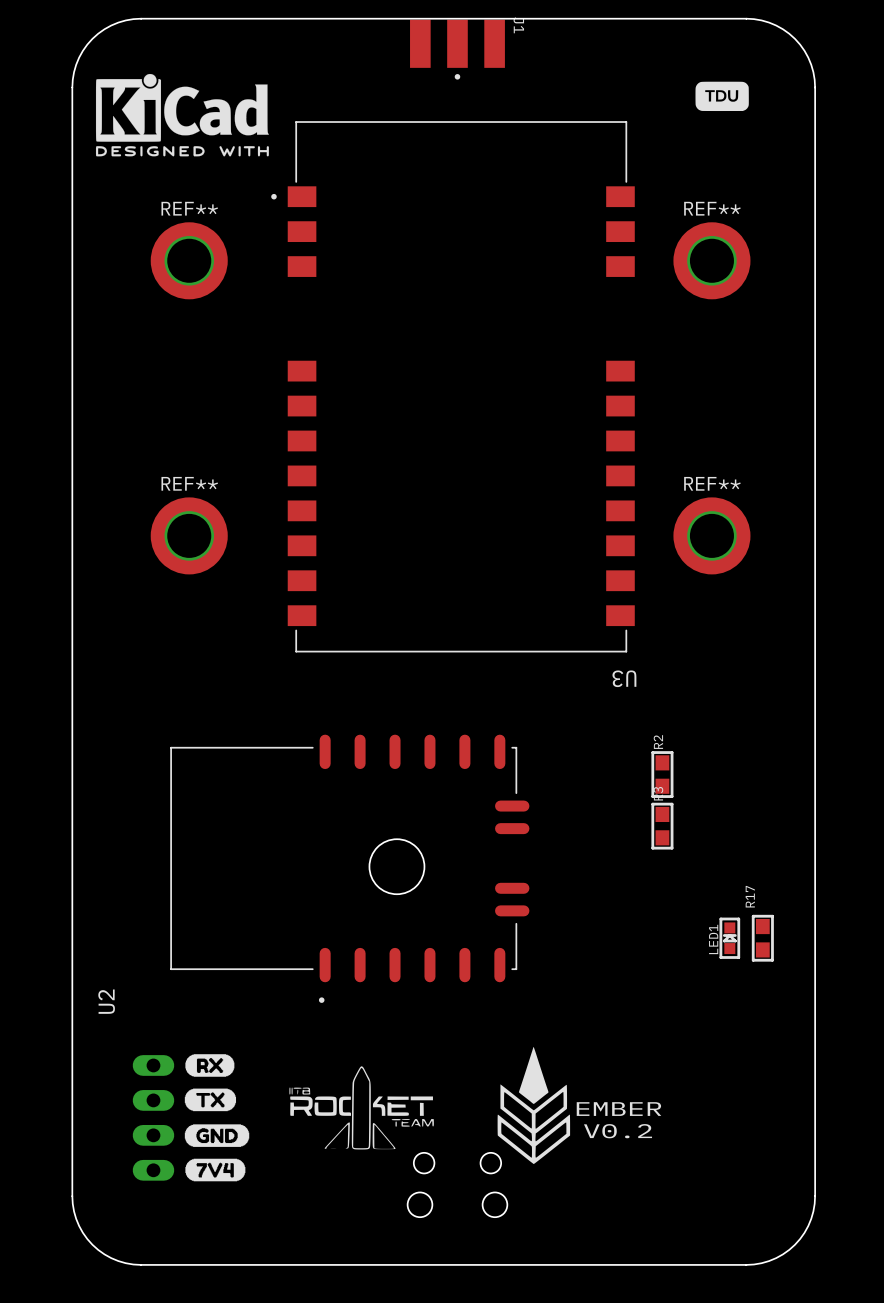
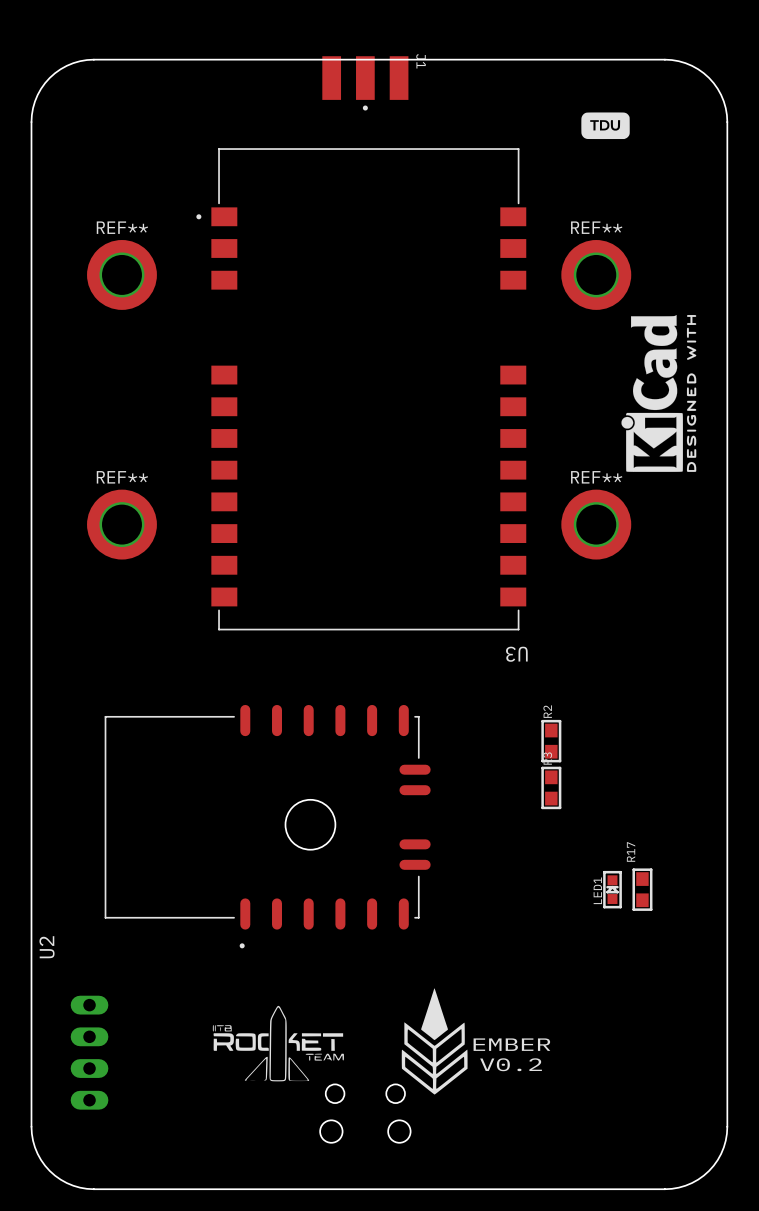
board edge: (141, 18) (754, 19) (769, 22) (789, 33) (800, 44) (808, 57) (813, 72) (815, 87) (815, 1196) (811, 1218) (804, 1232) (794, 1244) (776, 1258) (761, 1263) (746, 1264) (141, 1264) (125, 1263) (104, 1254) (87, 1239) (79, 1225) (74, 1211) (72, 1196) (72, 87) (76, 64) (82, 50) (92, 38) (104, 29) (118, 22) (141, 18) -> (93, 59) (73, 63) (60, 69) (49, 77) (41, 88) (34, 101) (31, 122) (31, 1126) (33, 1140) (37, 1153) (49, 1170) (60, 1179) (73, 1185) (93, 1189) (664, 1189) (678, 1187) (692, 1183) (709, 1170) (717, 1160) (723, 1147) (727, 1126) (727, 122) (725, 108) (721, 94) (713, 83) (698, 69) (685, 63) (671, 60) (93, 59)
drawing: [95, 73, 269, 157] -> none
drawing: none -> [621, 314, 697, 472]
drawing: [184, 1054, 250, 1182] -> none

